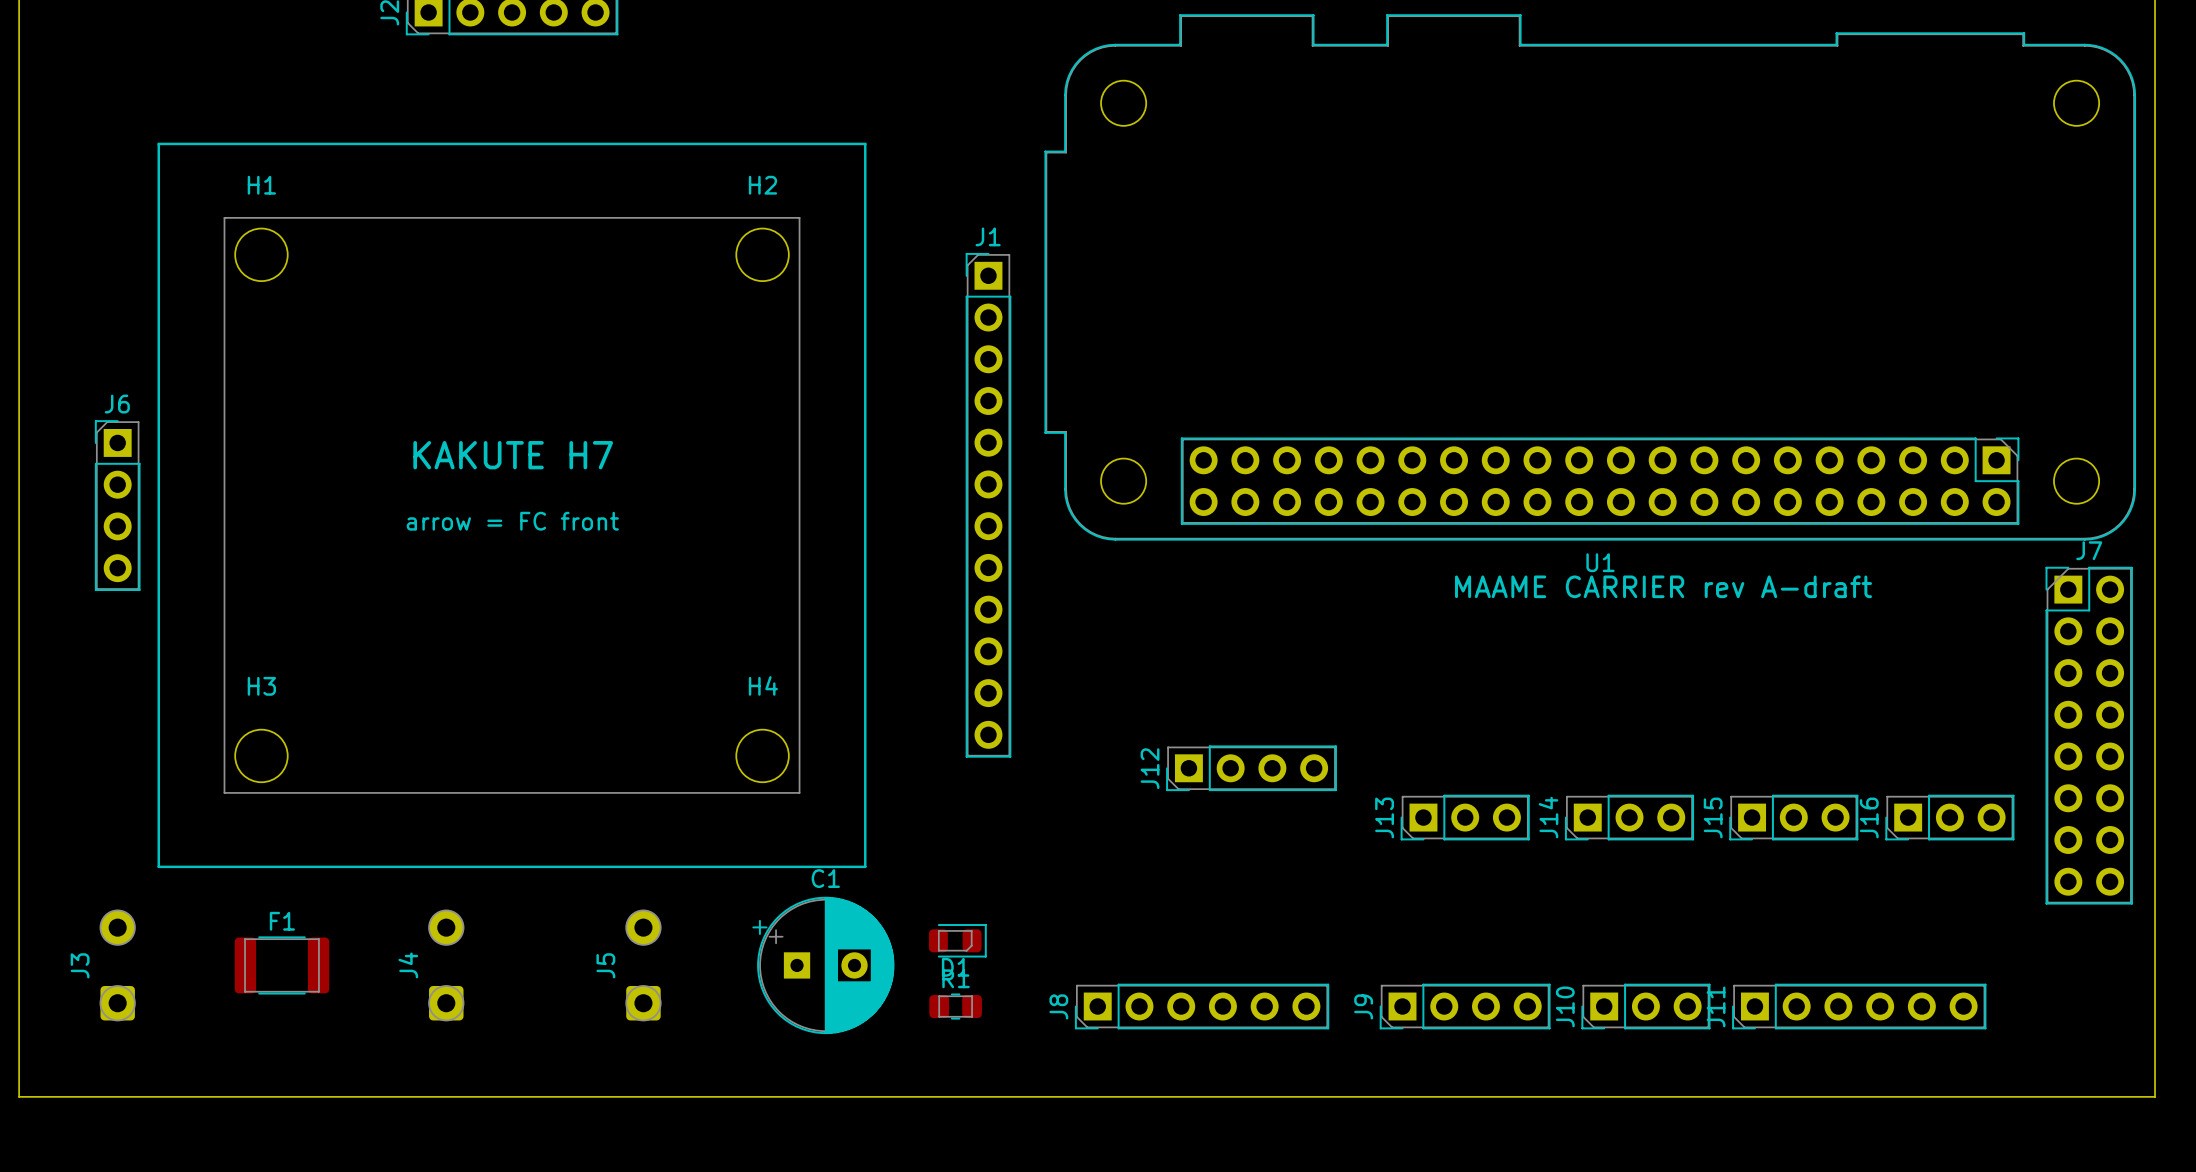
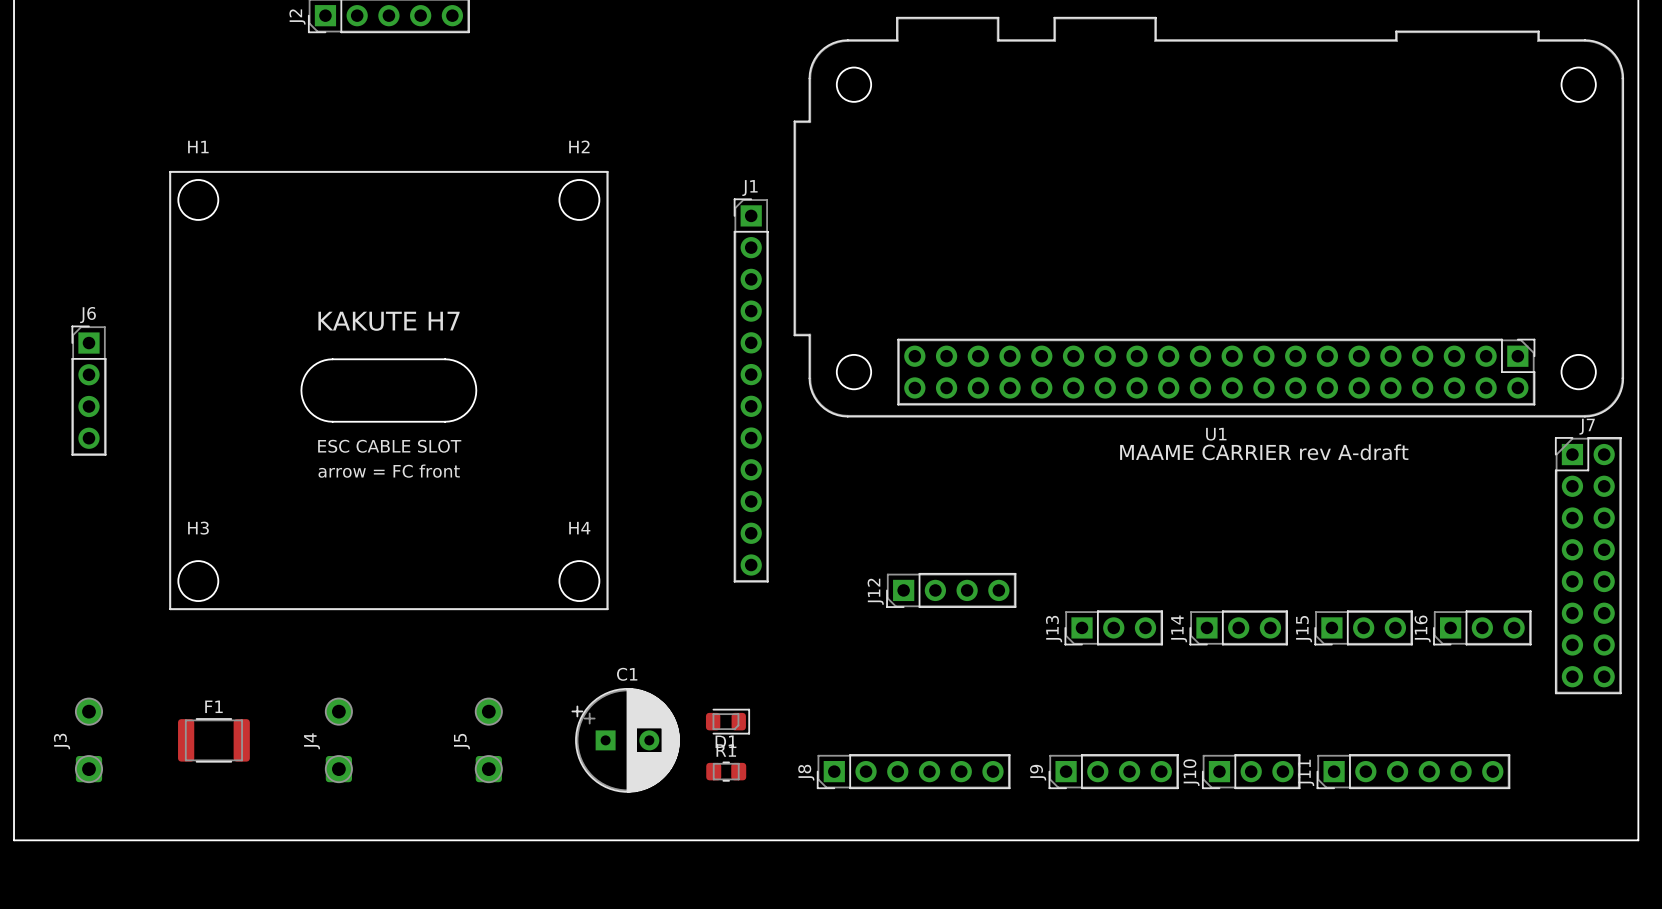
line: (158, 143) (865, 143) (865, 866) (158, 866) (158, 143) -> (170, 171) (170, 609) (607, 609) (607, 171) (170, 171)
text position: KAKUTE H7 (513, 455) -> KAKUTE H7 (389, 321)
board edge: none -> (332, 359) (453, 360) (464, 365) (472, 374) (476, 386) (475, 398) (472, 406) (464, 415) (449, 421) (324, 420) (313, 415) (305, 406) (302, 398) (301, 386) (305, 374) (313, 365) (324, 360) (332, 359)
text position: arrow = FC front (512, 521) -> arrow = FC front (389, 471)
text: none -> ESC CABLE SLOT (389, 446)

